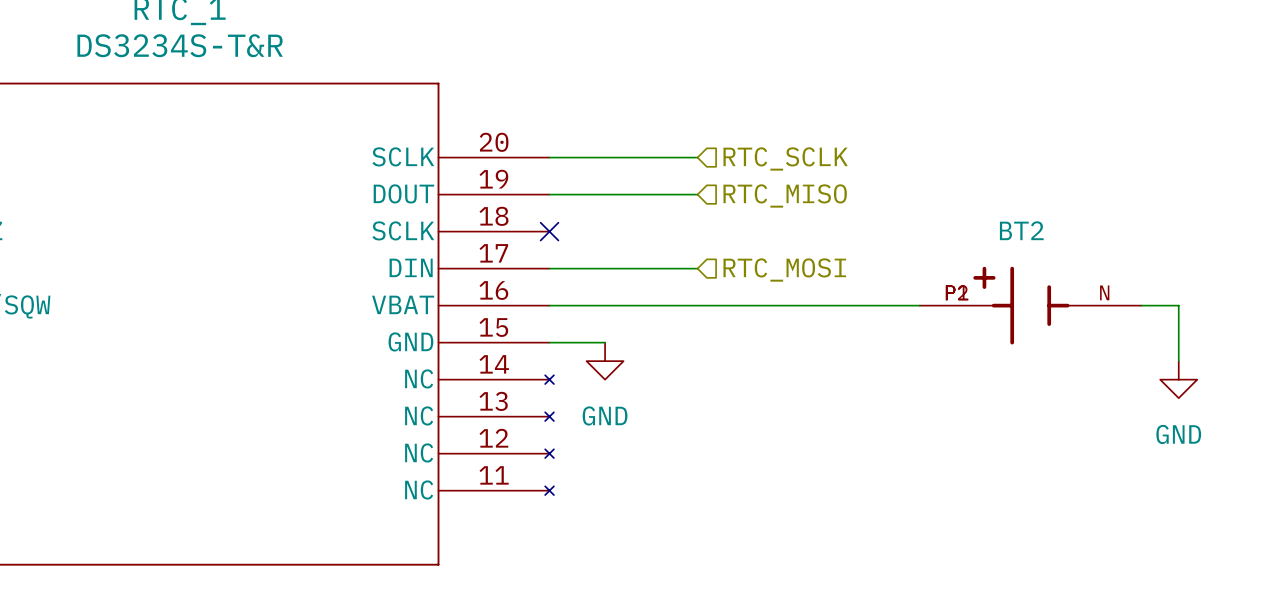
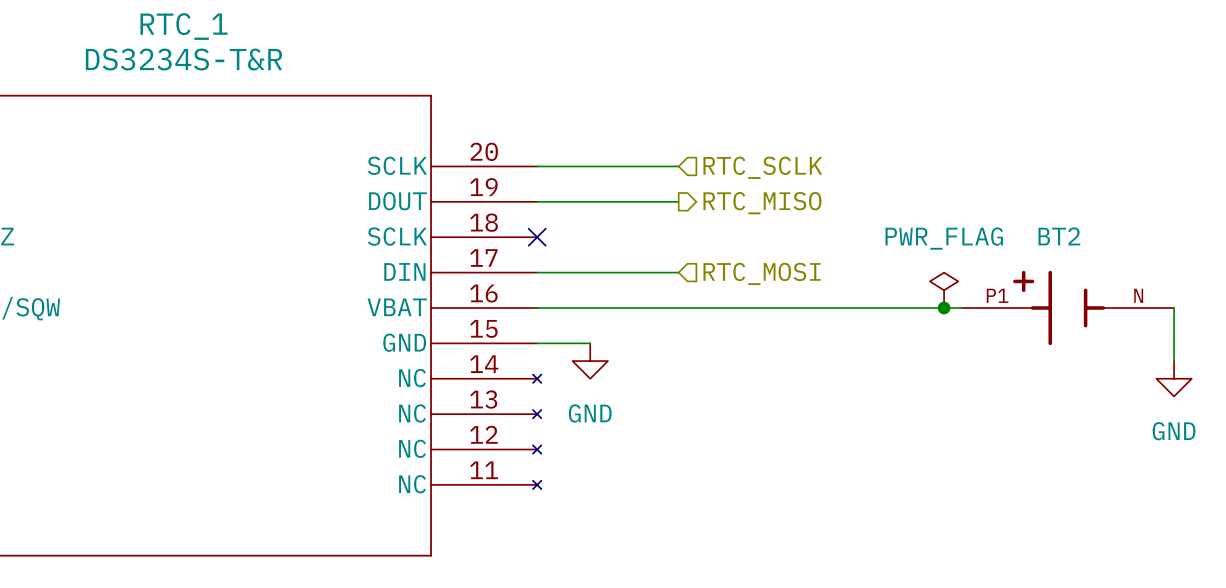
hierarchical label shape: input (785, 195) -> output (762, 203)
BT2 symbol: [919, 266, 1142, 345] -> [961, 270, 1175, 346]
power symbol: none -> PWR_FLAG (944, 290)
junction: none -> (944, 307)
wire: (1141, 305) (1178, 305) (1178, 361) -> none
wire: none -> (1174, 307) (1174, 361)
power symbol position: GND (1178, 379) -> GND (1174, 378)

